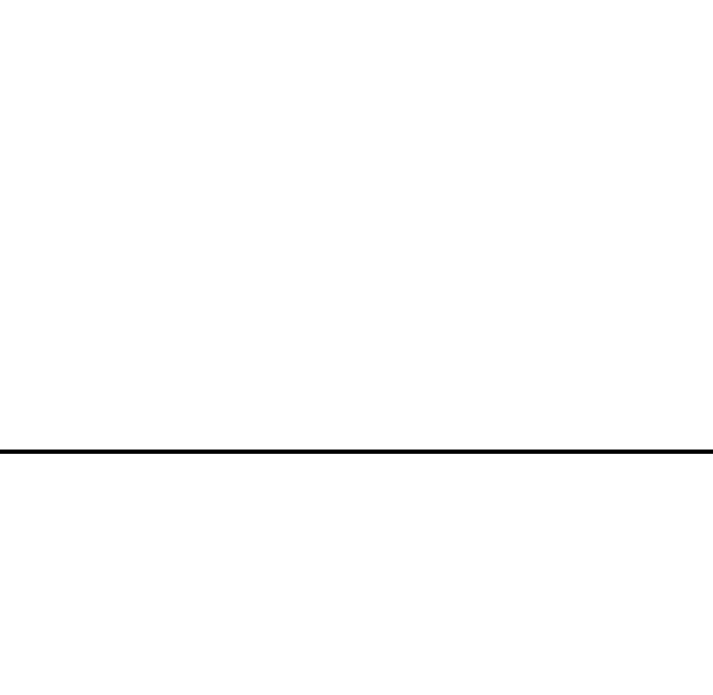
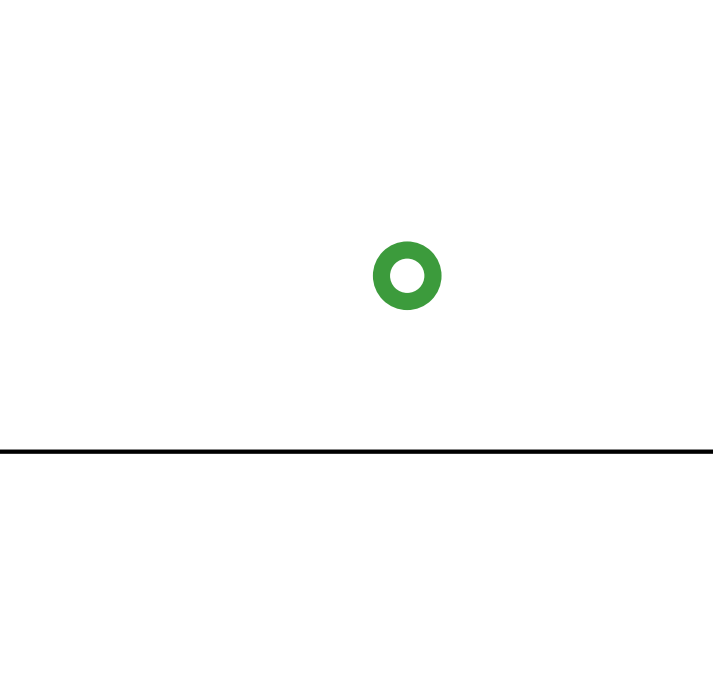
via: none -> (407, 275)

